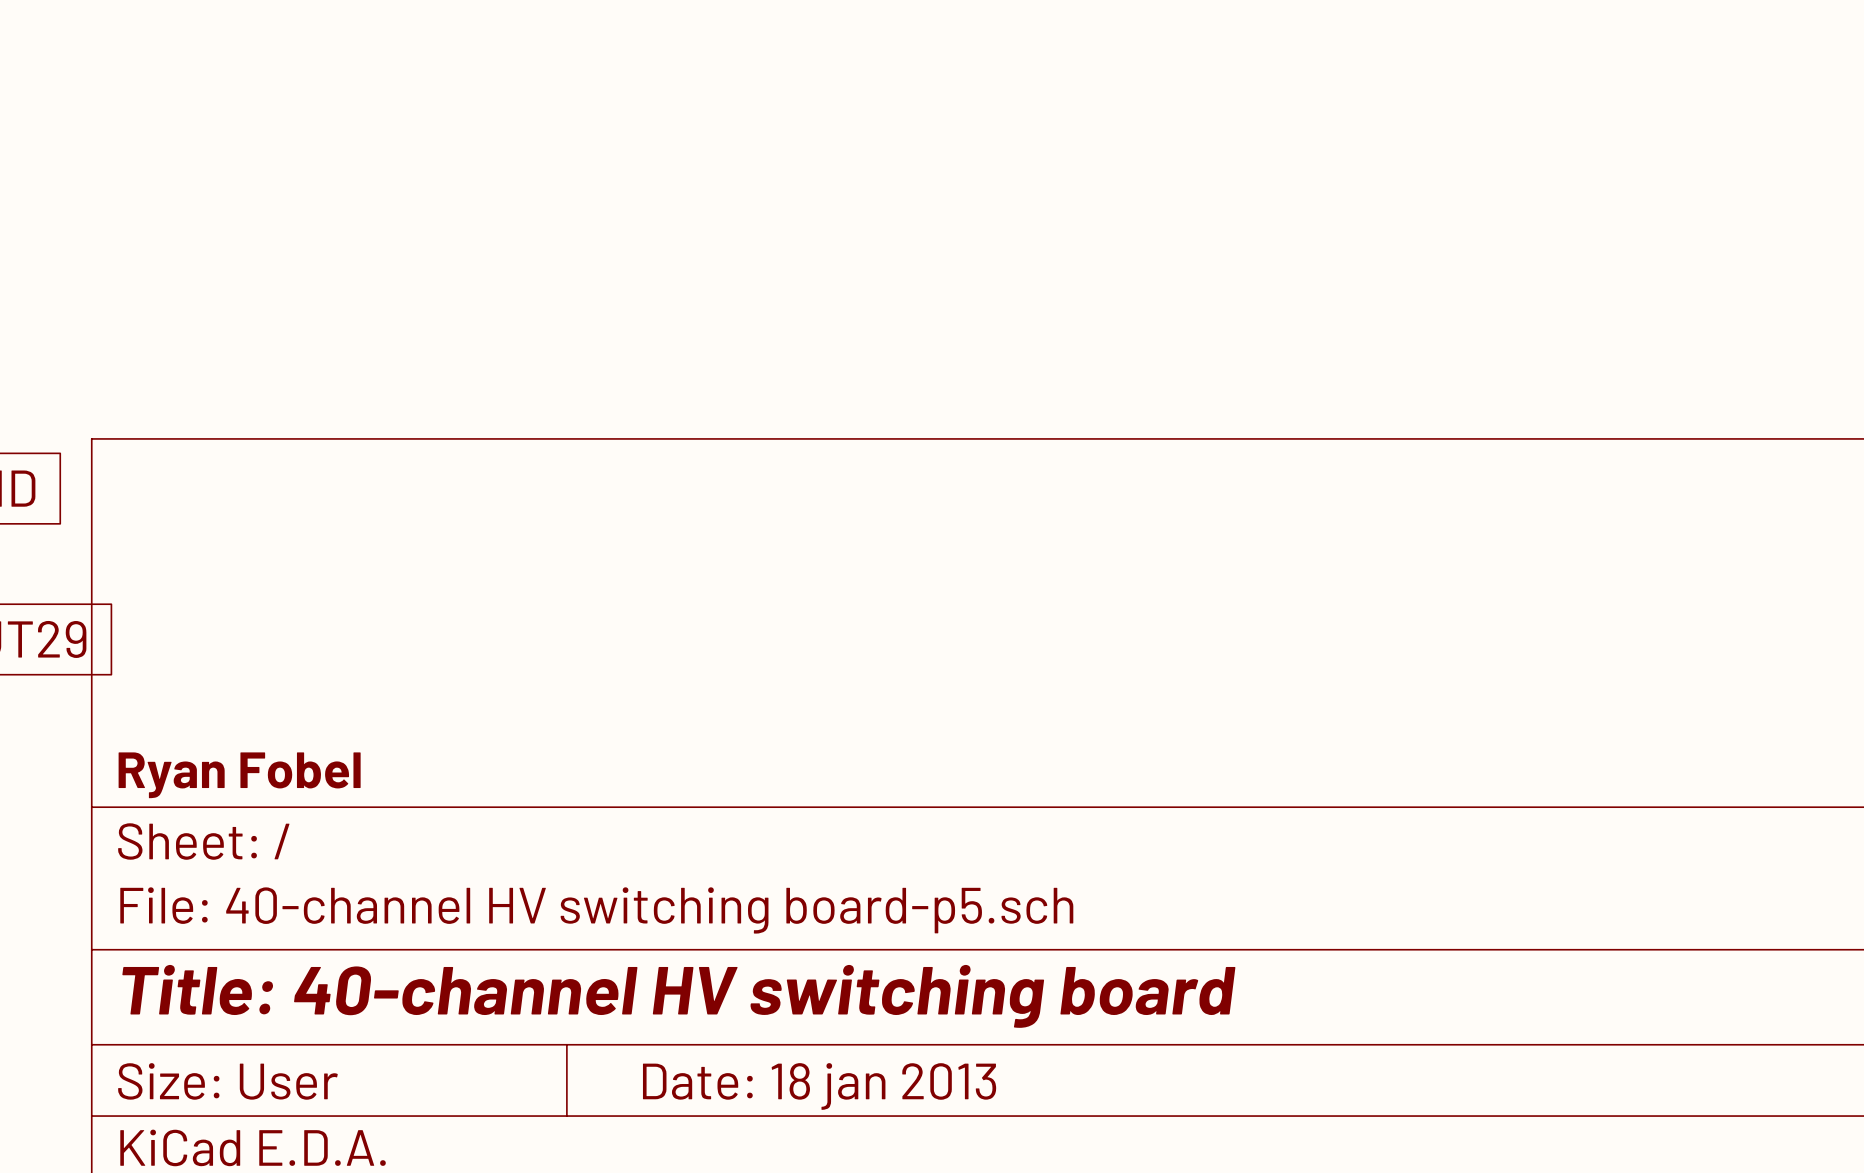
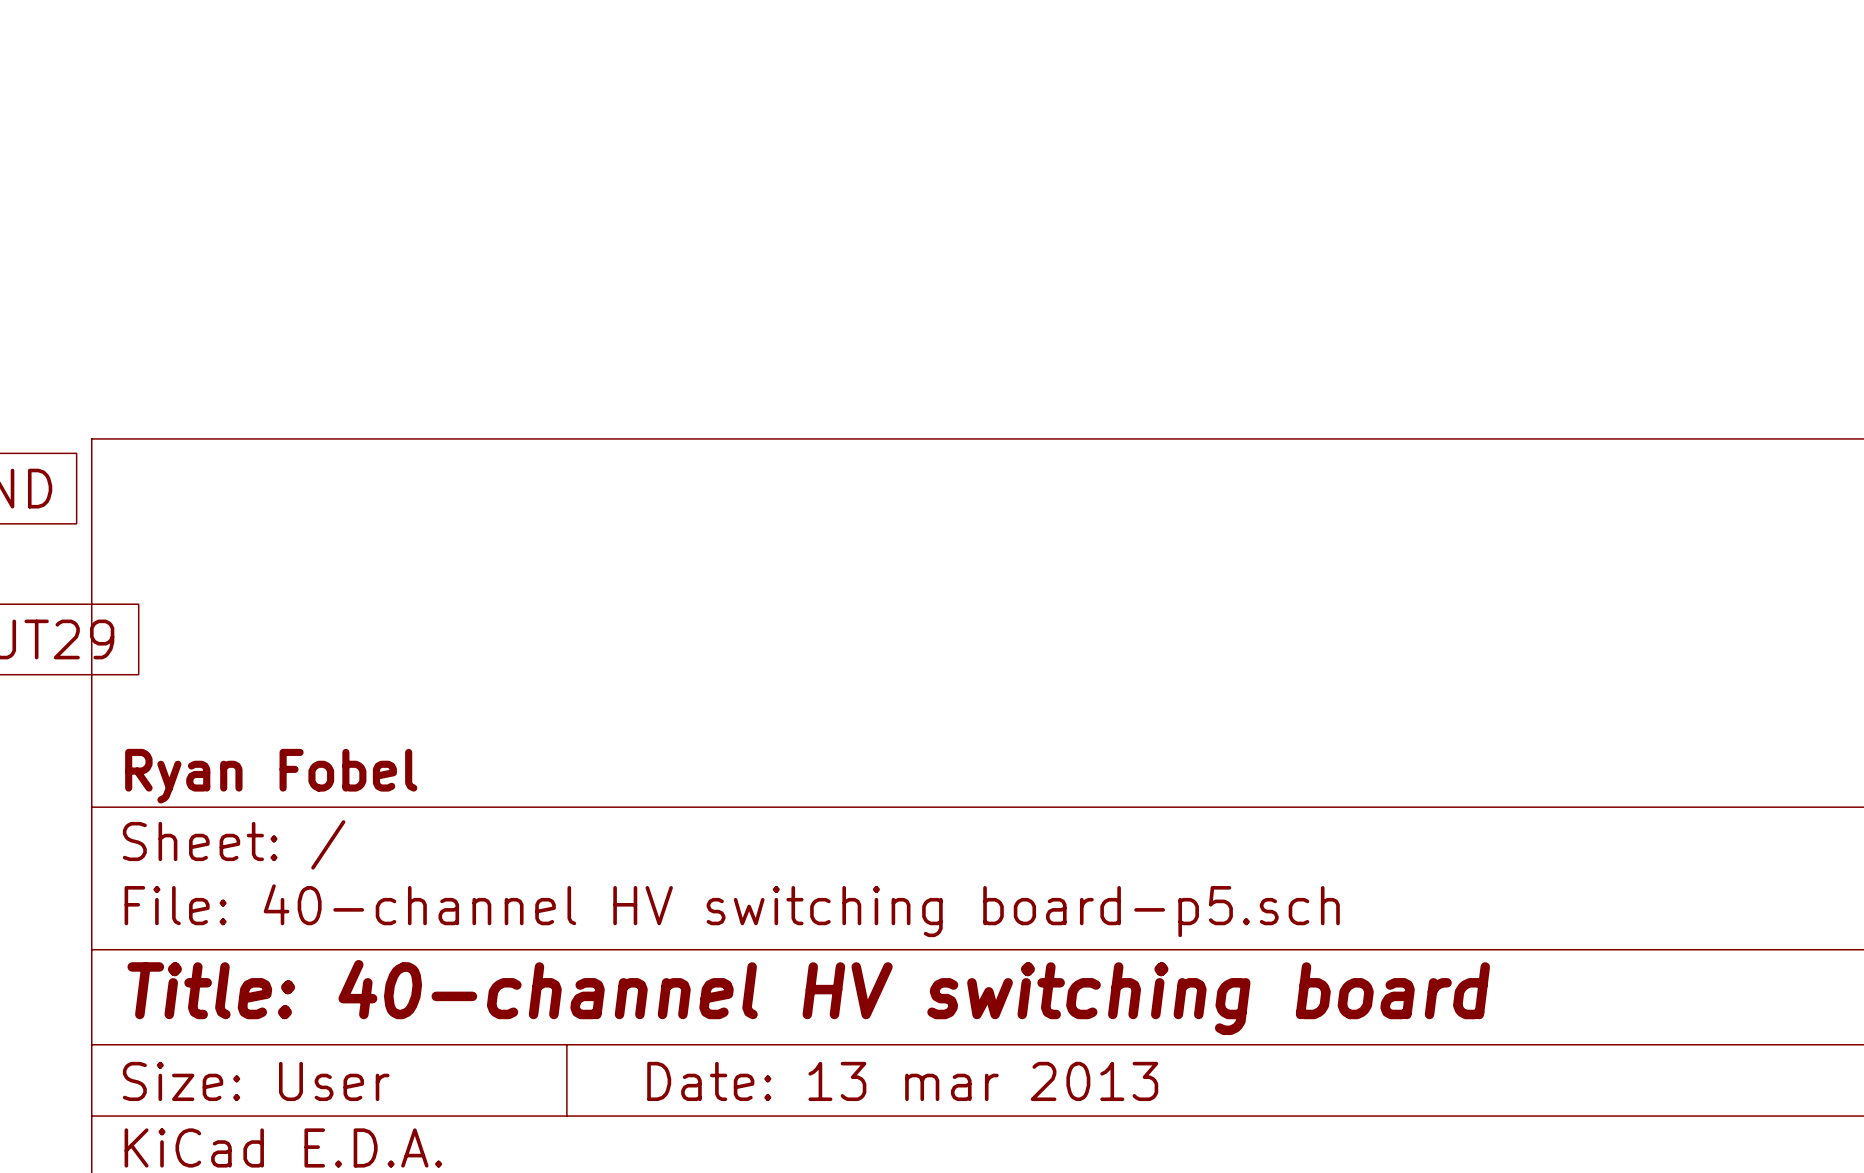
title block: Date: 18 jan 2013 (819, 1086) -> Date: 13 mar 2013 (902, 1081)

